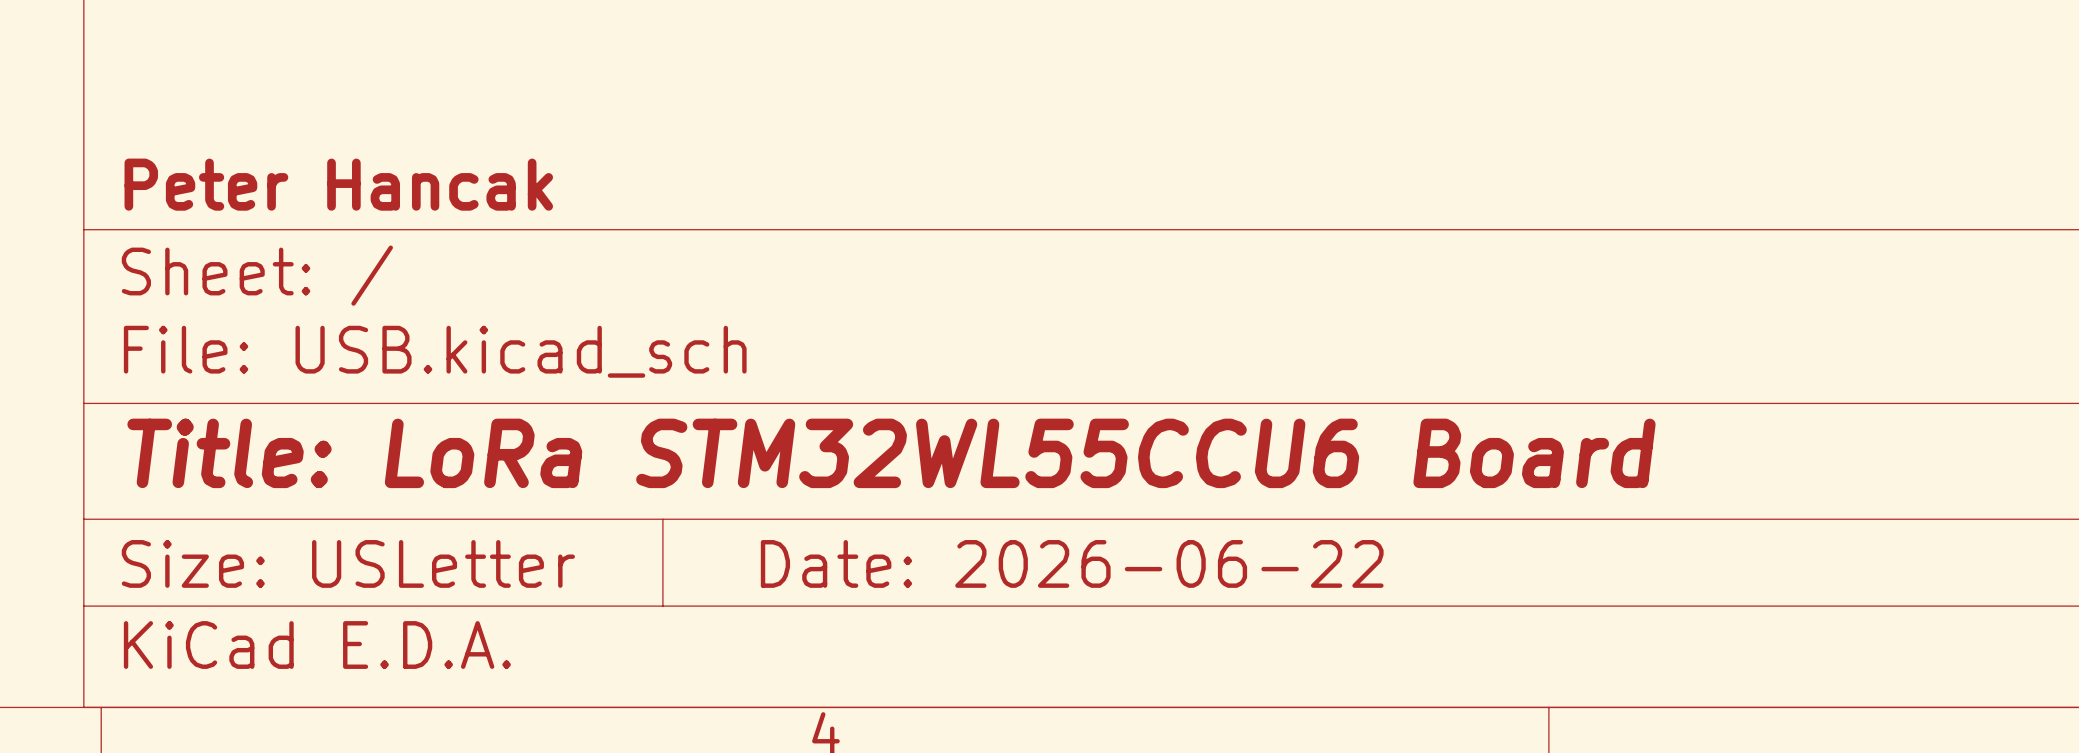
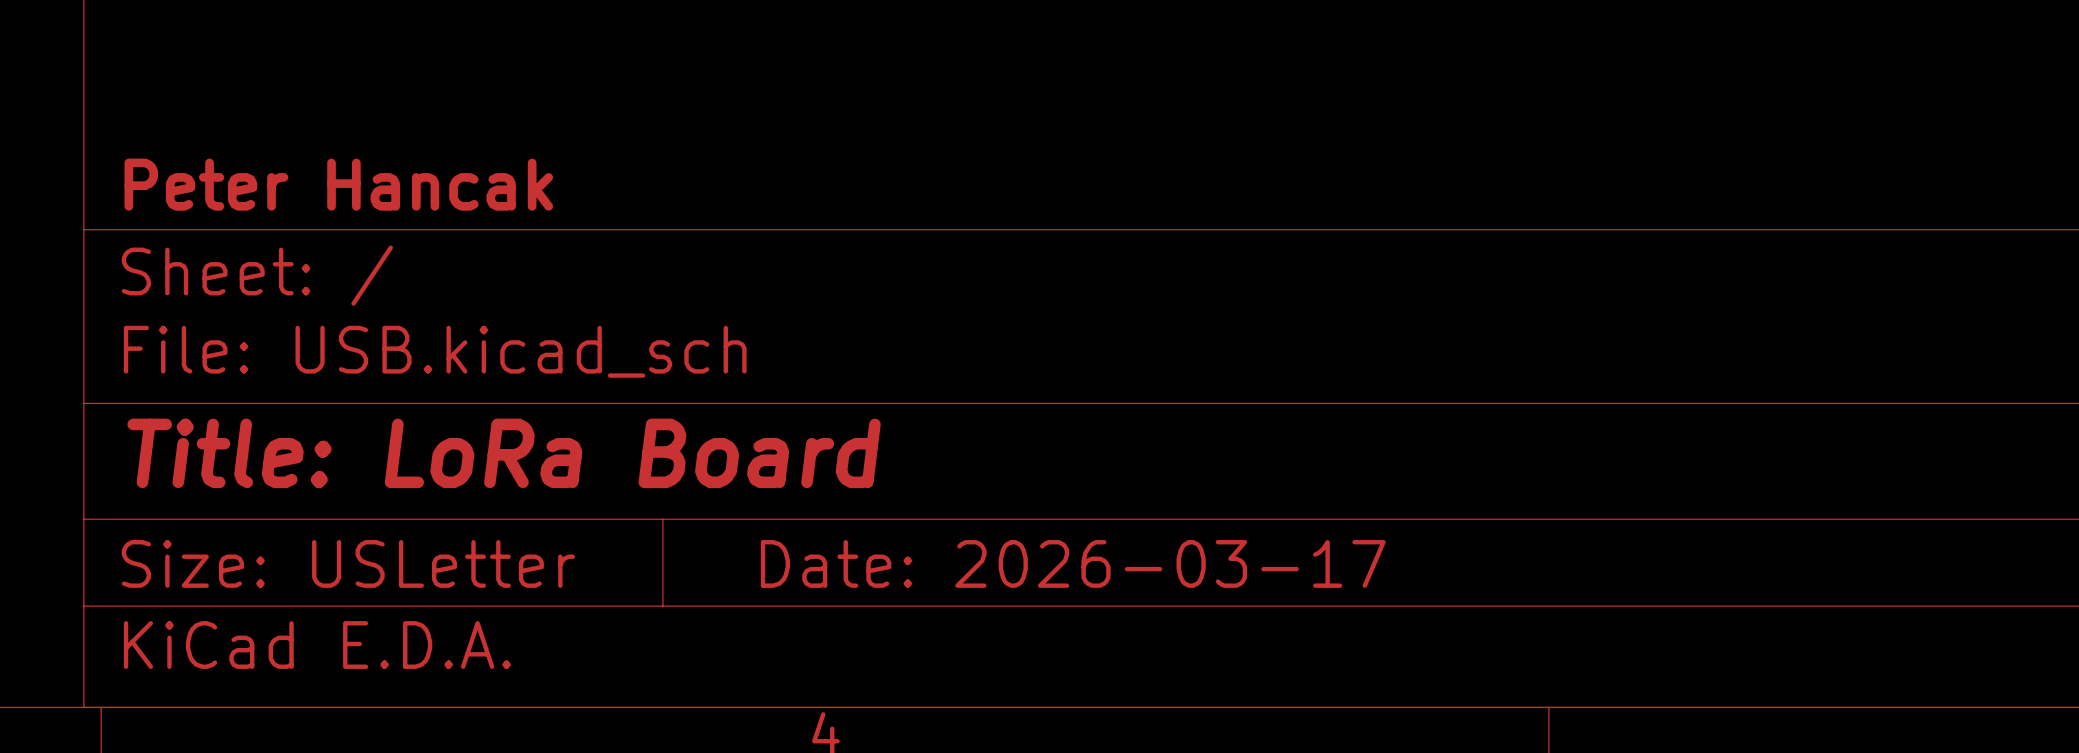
title block: Title: LoRa STM32WL55CCU6 Board (891, 453) -> Title: LoRa Board (504, 453)
title block: Date: 2026-06-22 (1072, 563) -> Date: 2026-03-17 (1073, 563)

